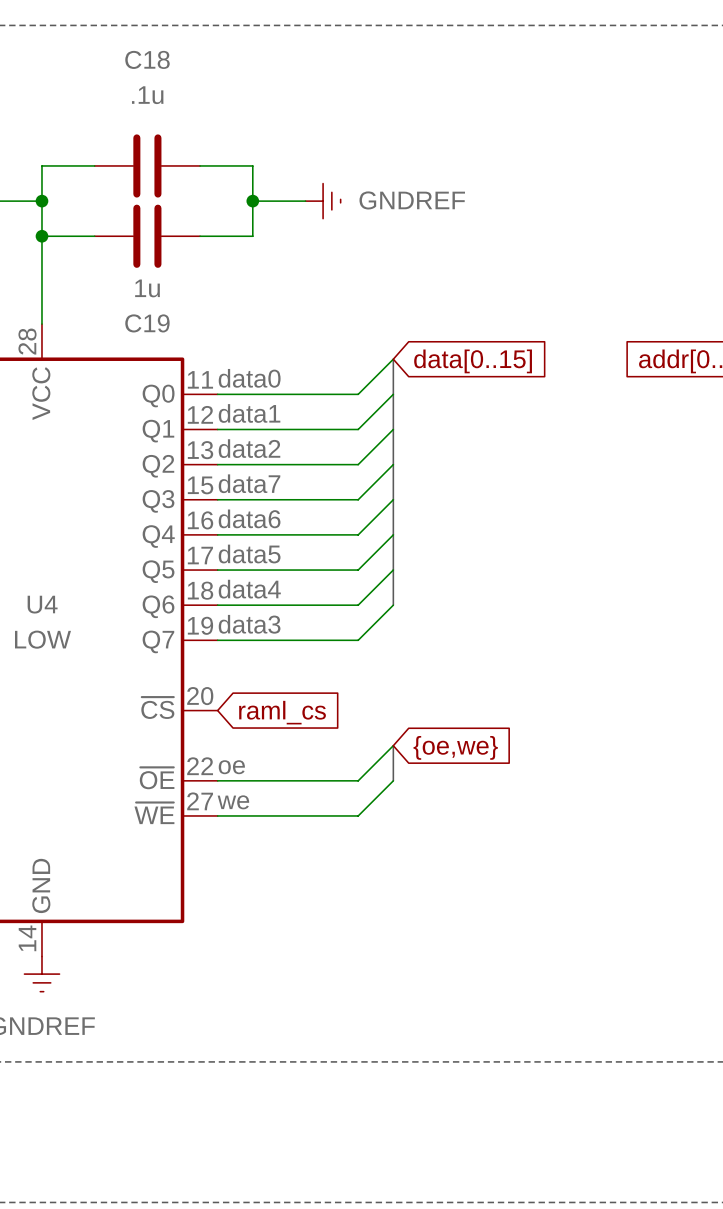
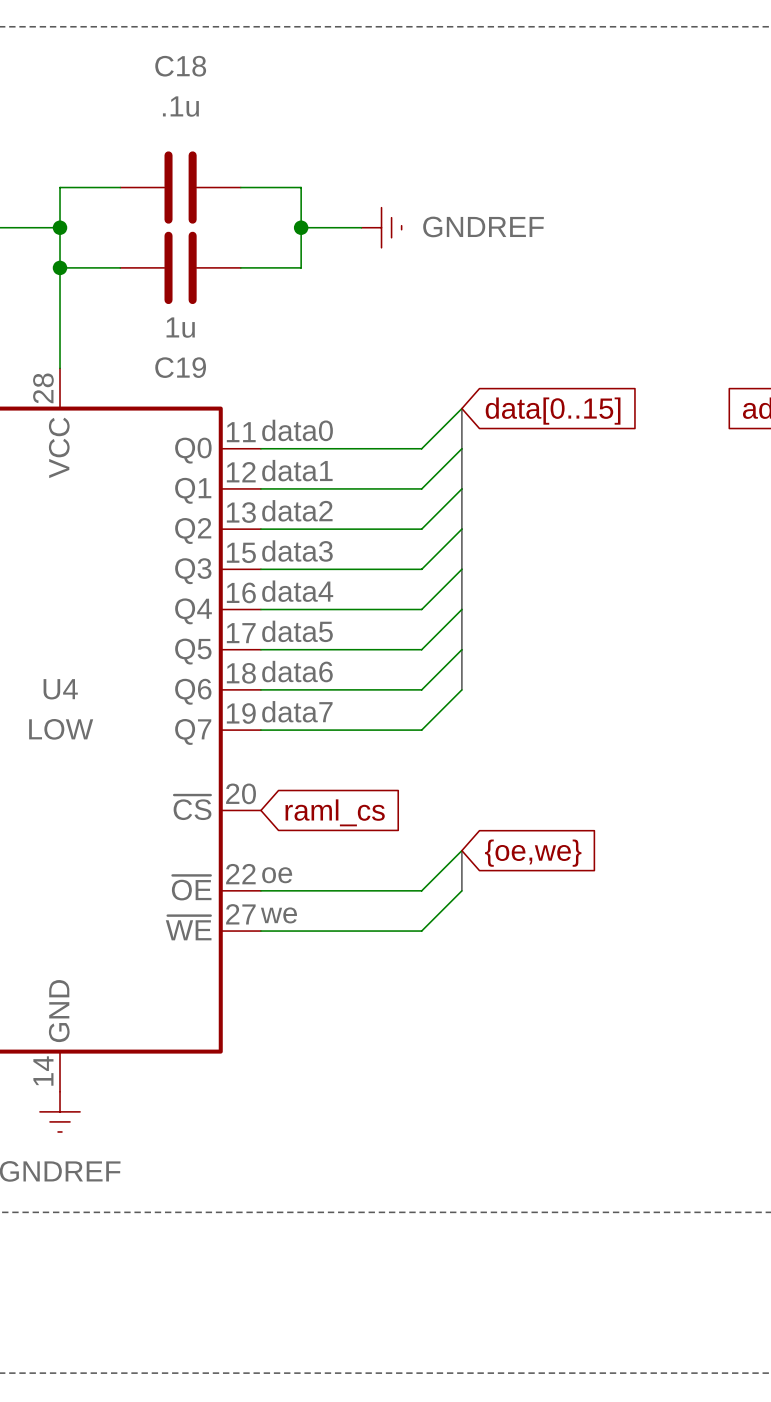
label: data7 (249, 483) -> data3 (297, 551)
label: data6 (249, 518) -> data4 (297, 591)
label: data4 (249, 589) -> data6 (297, 671)
label: data3 (249, 624) -> data7 (297, 711)

